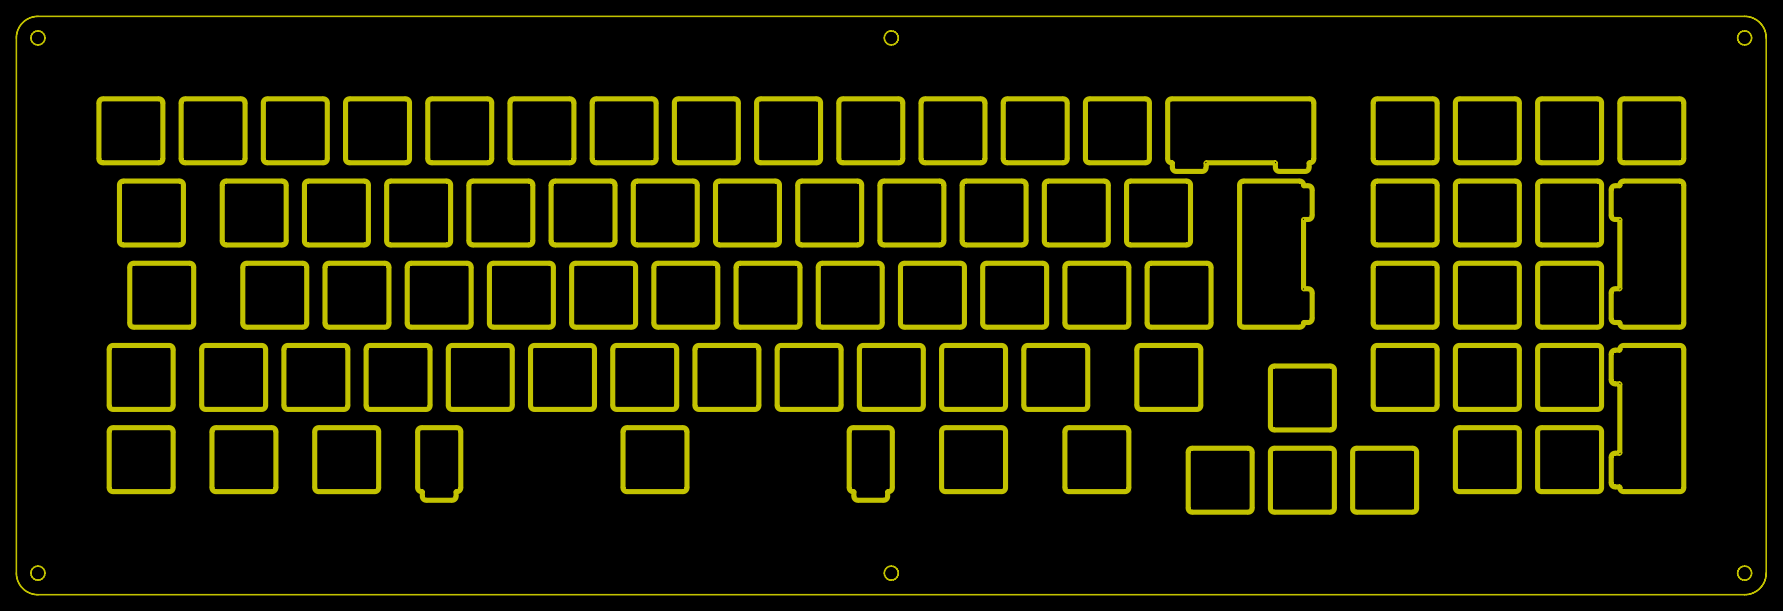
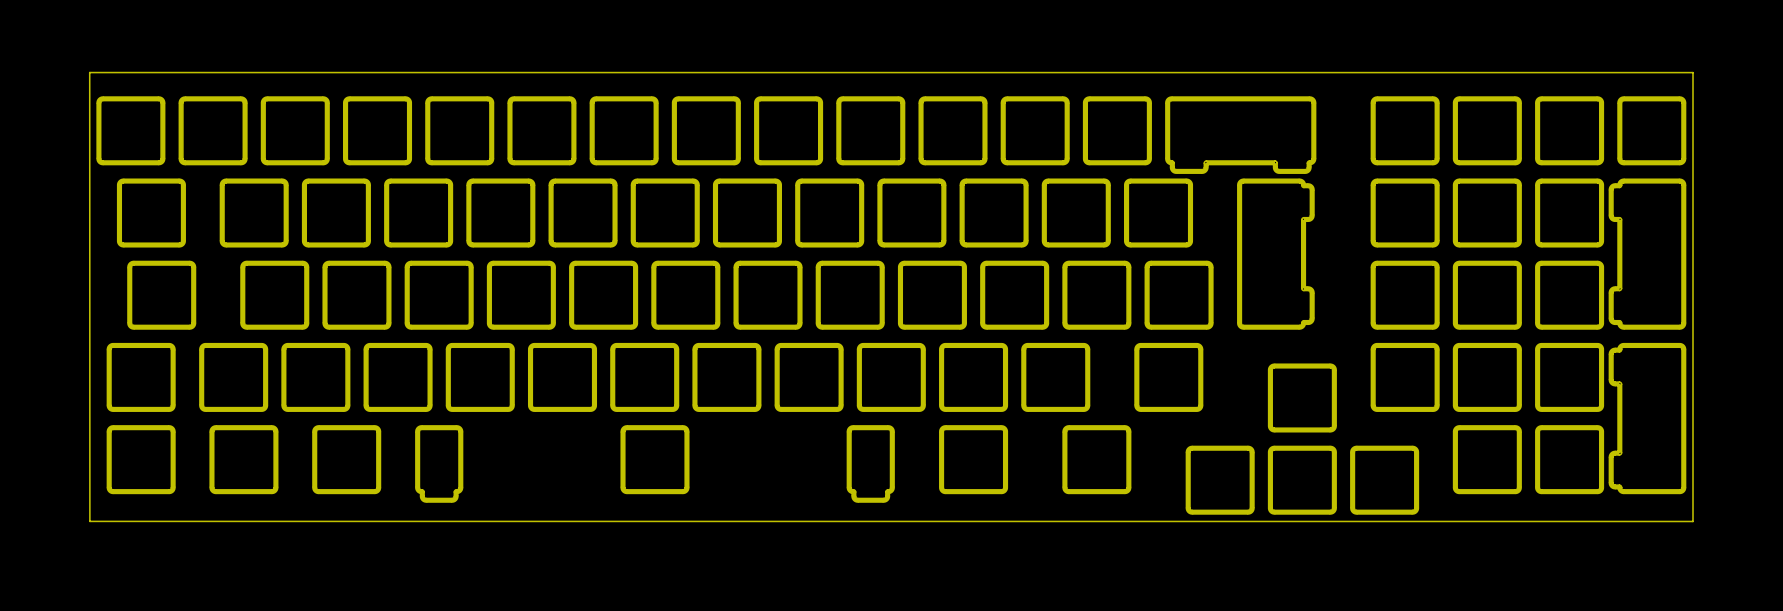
board edge: (37, 16) (1751, 17) (1762, 25) (1766, 37) (1765, 579) (1757, 590) (1744, 594) (31, 593) (20, 585) (16, 573) (16, 37) (18, 29) (22, 22) (29, 18) (37, 16) -> (89, 72) (89, 521) (1692, 521) (1692, 72) (89, 72)
board edge: (37, 30) (32, 33) (30, 37) (33, 43) (37, 44) (43, 42) (44, 37) (43, 33) (37, 30) -> none
board edge: (891, 30) (885, 33) (884, 37) (885, 42) (891, 44) (895, 43) (898, 37) (896, 33) (891, 30) -> none
board edge: (1744, 30) (1738, 33) (1737, 37) (1738, 42) (1744, 44) (1750, 42) (1751, 37) (1750, 33) (1744, 30) -> none
board edge: (37, 566) (33, 567) (30, 573) (33, 578) (37, 580) (43, 577) (44, 573) (42, 567) (37, 566) -> none
board edge: (891, 566) (887, 567) (884, 573) (885, 577) (891, 580) (895, 578) (898, 573) (895, 567) (891, 566) -> none
board edge: (1744, 566) (1740, 567) (1737, 573) (1738, 577) (1744, 580) (1748, 578) (1751, 573) (1748, 567) (1744, 566) -> none

